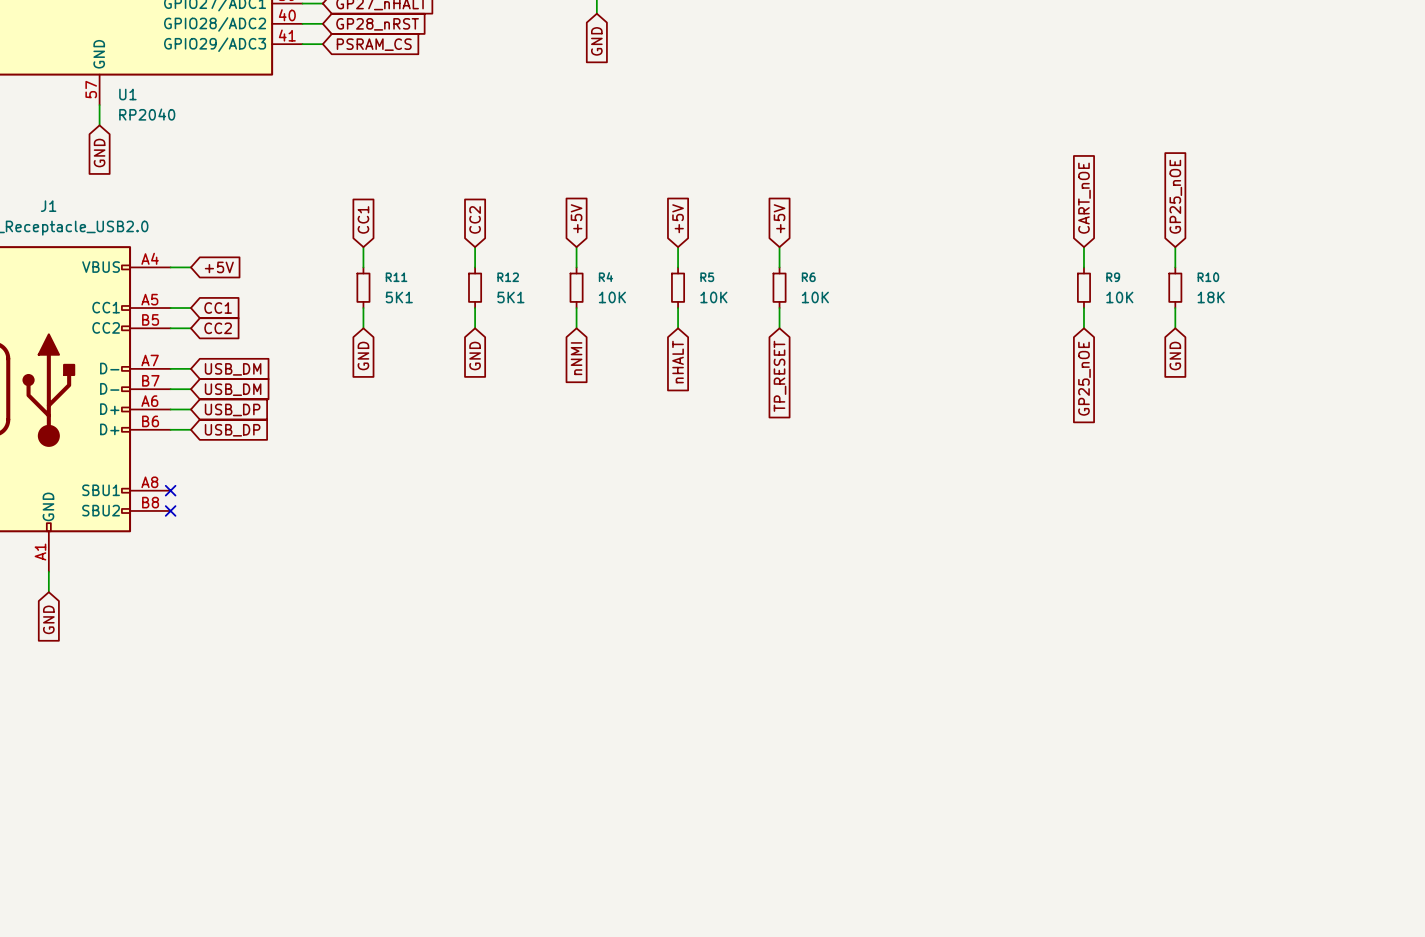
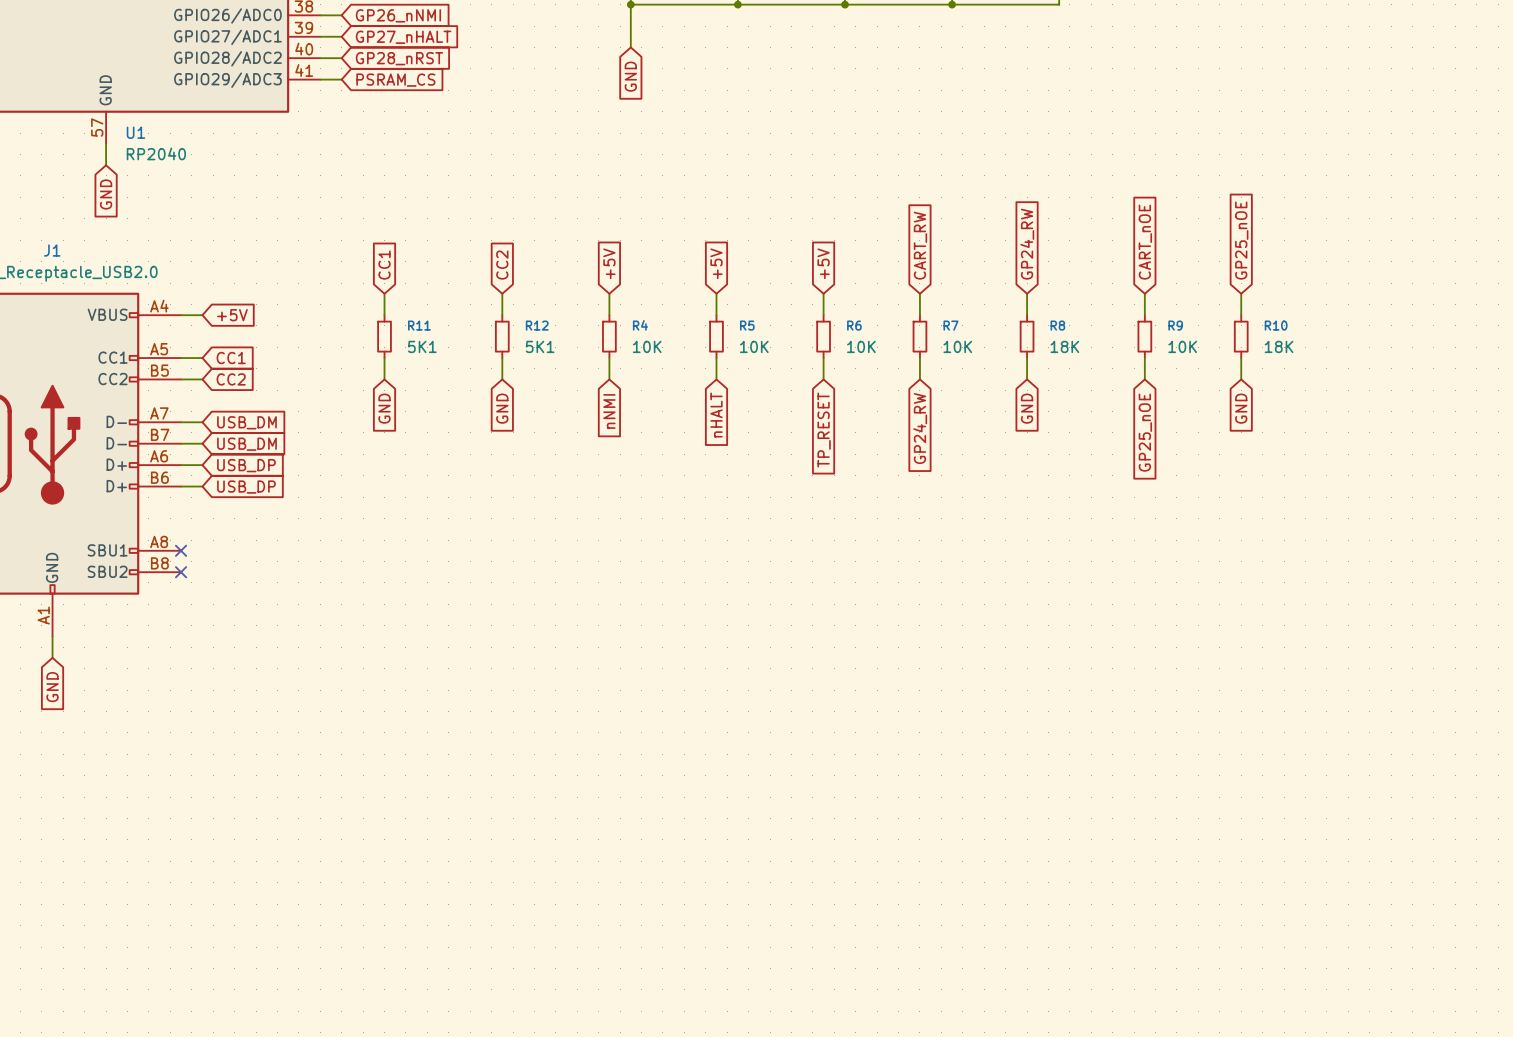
global label: none -> GP24_RW (1027, 244)
global label: none -> CART_RW (920, 245)
wire: none -> (919, 293) (919, 315)
wire: none -> (1027, 293) (1027, 315)
R7: none -> 10K (919, 336)
R8: none -> 18K (1027, 336)
wire: none -> (919, 358) (919, 379)
wire: none -> (1027, 358) (1027, 379)
global label: none -> GND (1027, 408)
global label: none -> GP24_RW (920, 428)

